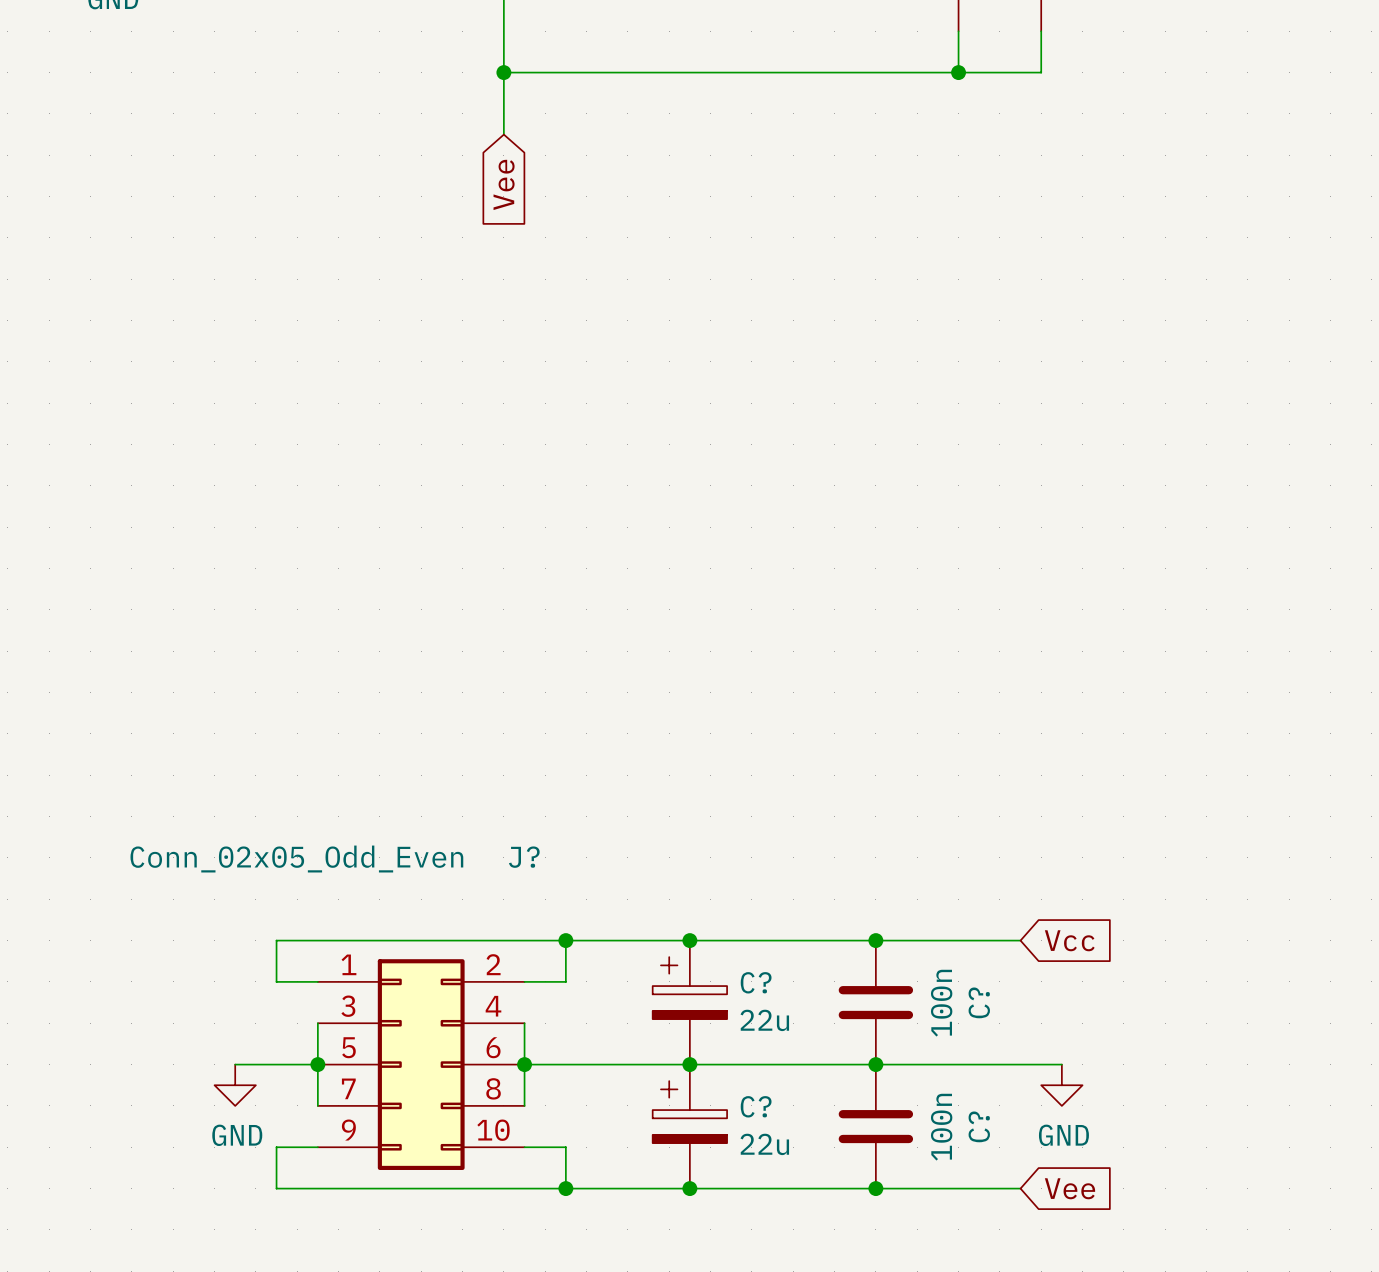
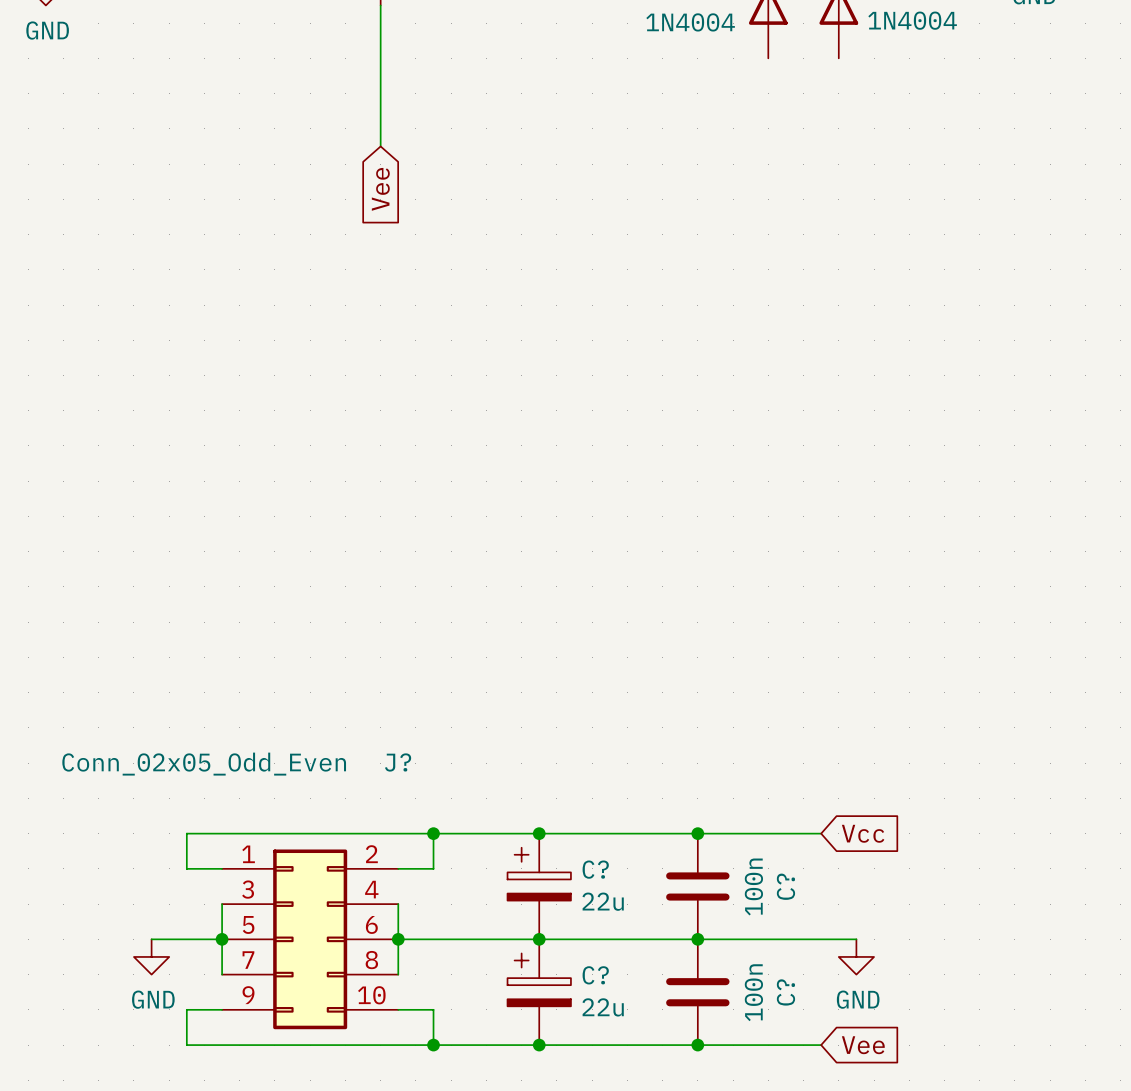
wire: (958, 31) (958, 72) -> none
wire: (1041, 31) (1041, 72) (503, 72) -> none
junction: (503, 72) -> none
junction: (958, 72) -> none

